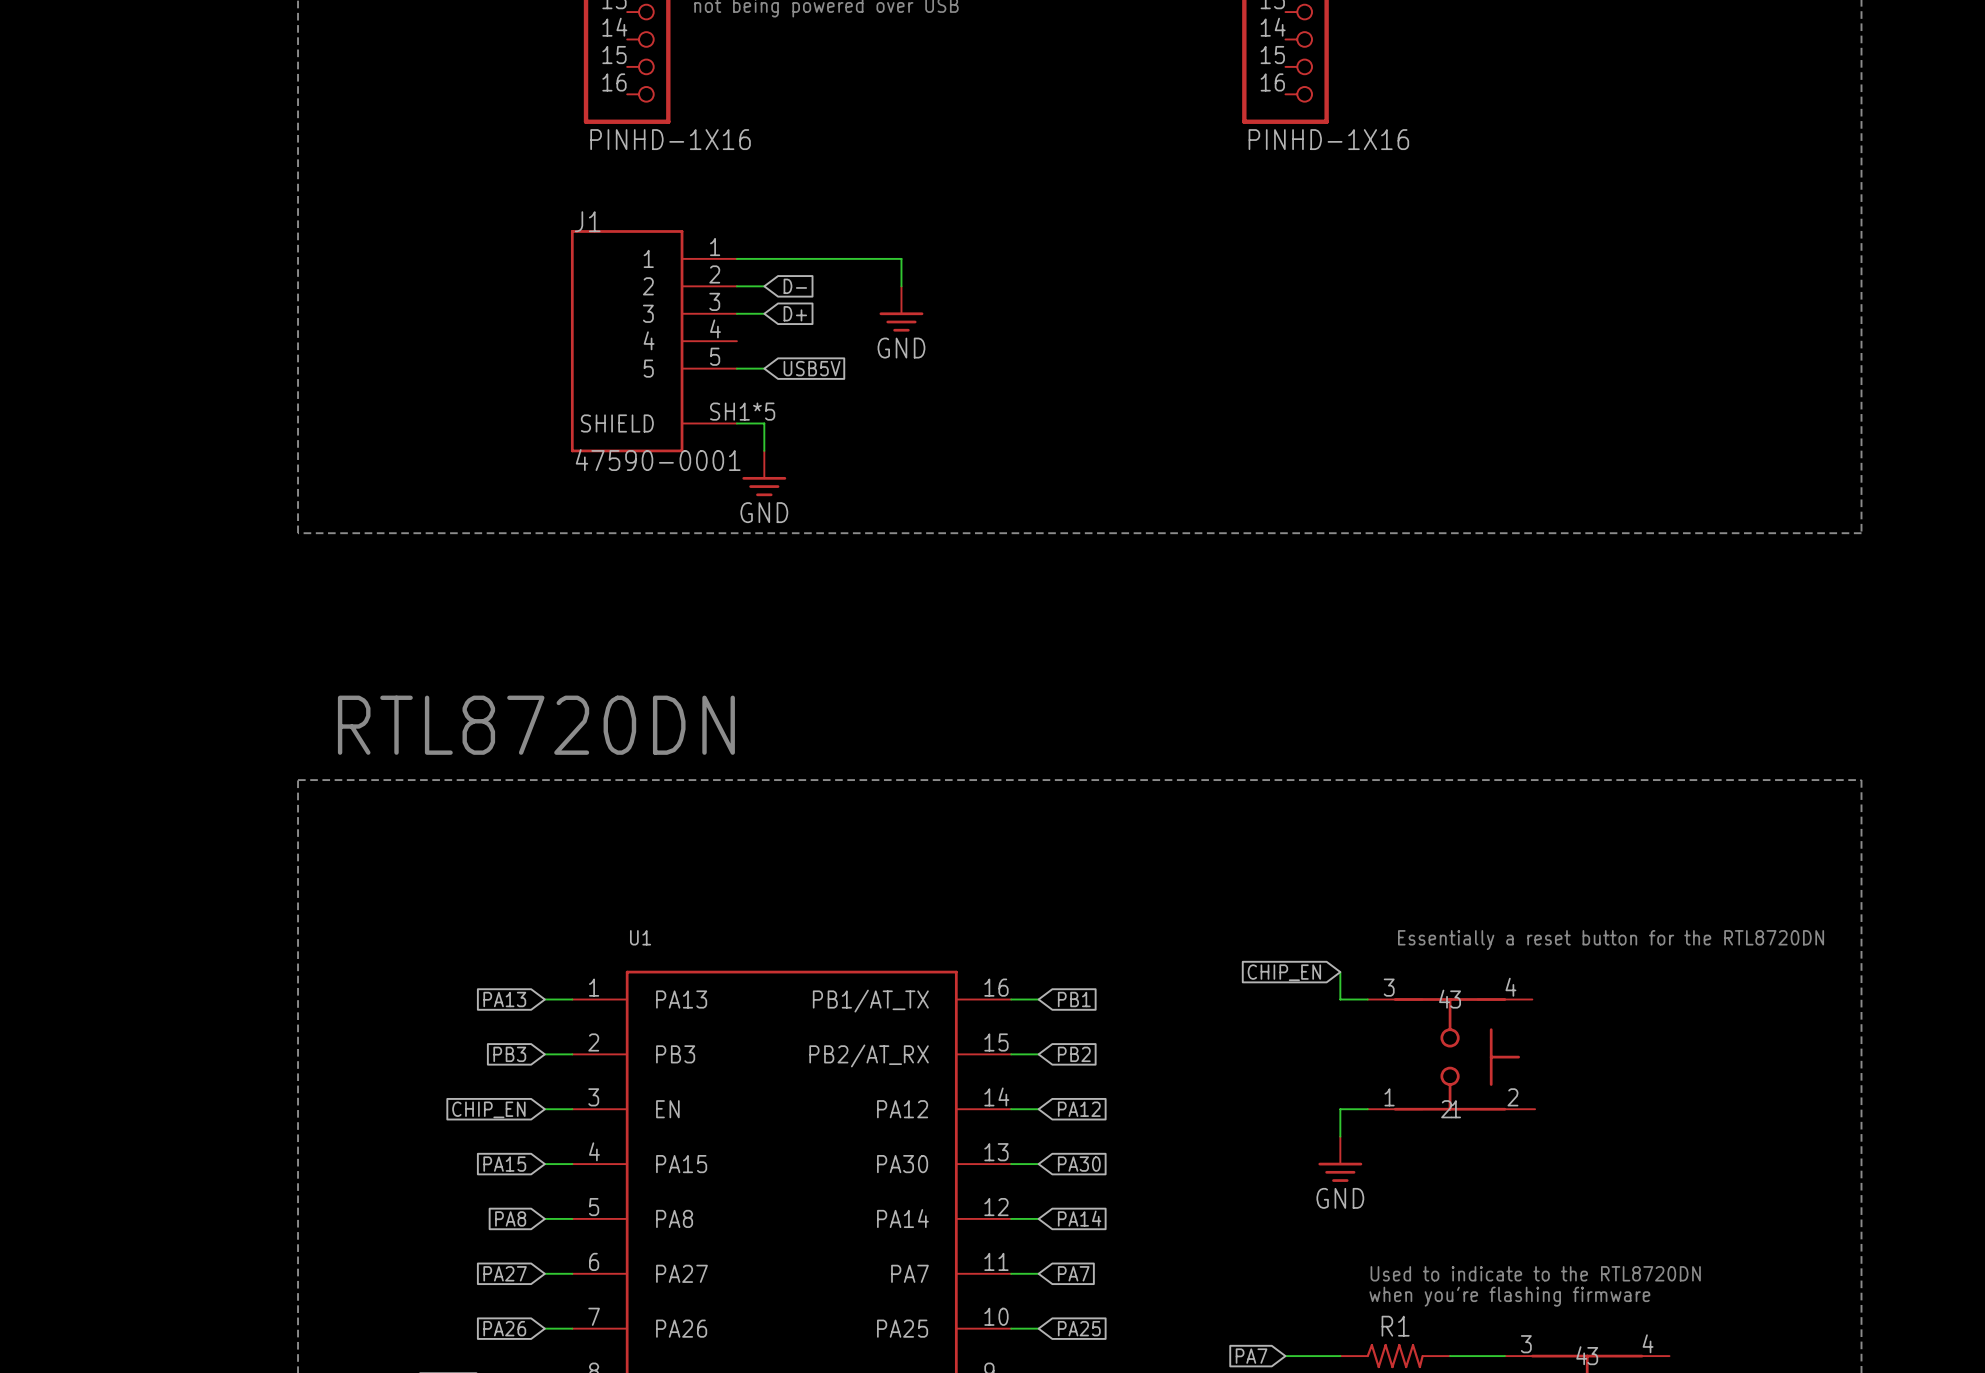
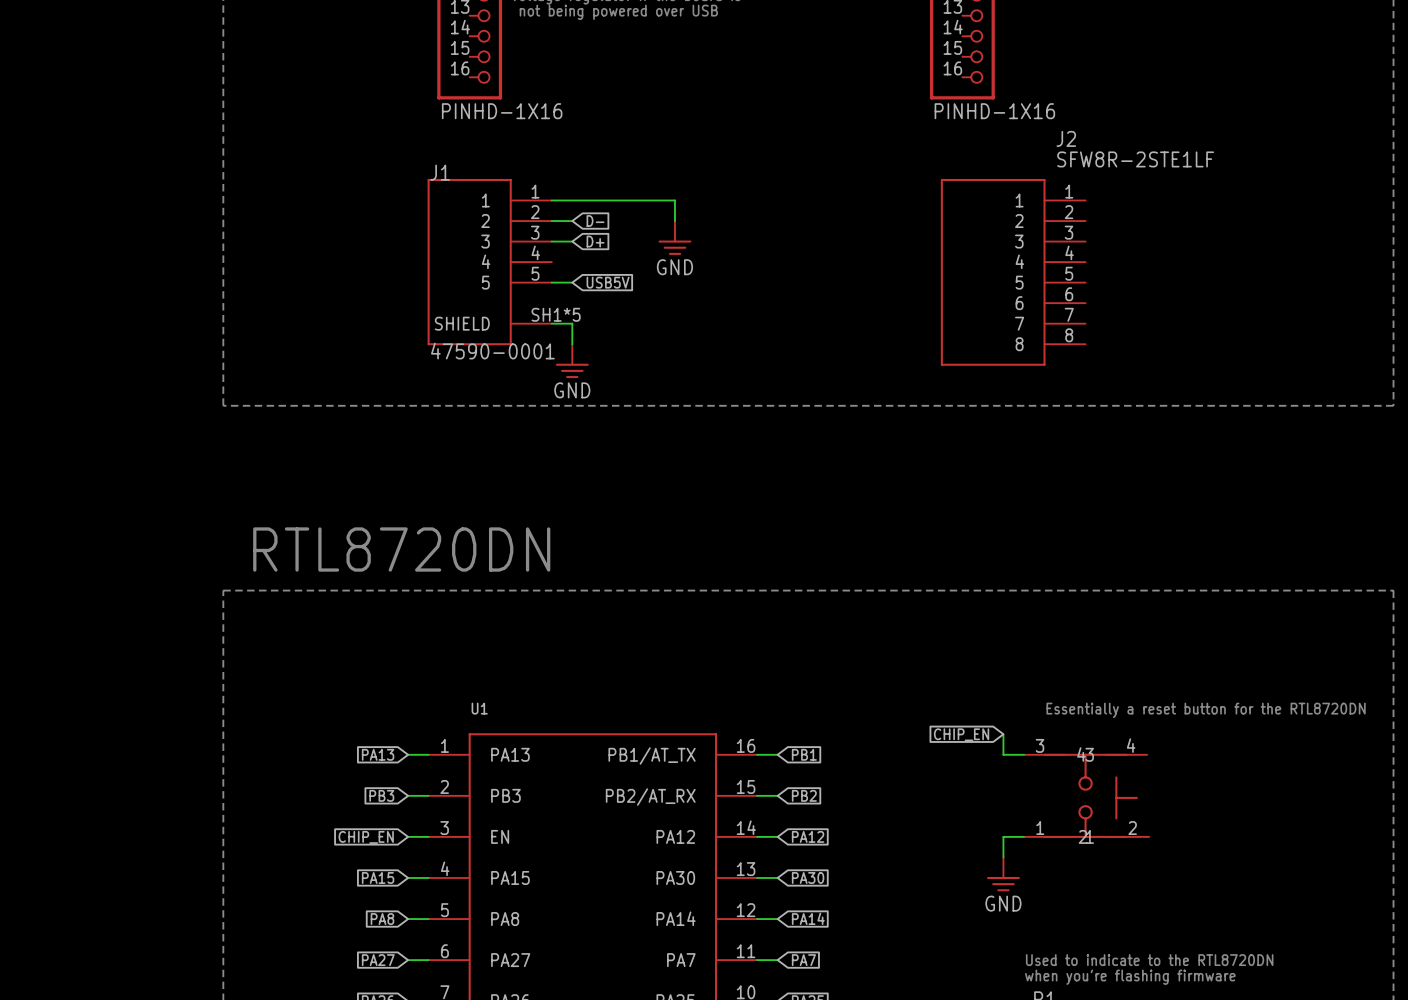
J2: none -> SFW8R-2STE1LF (1013, 272)

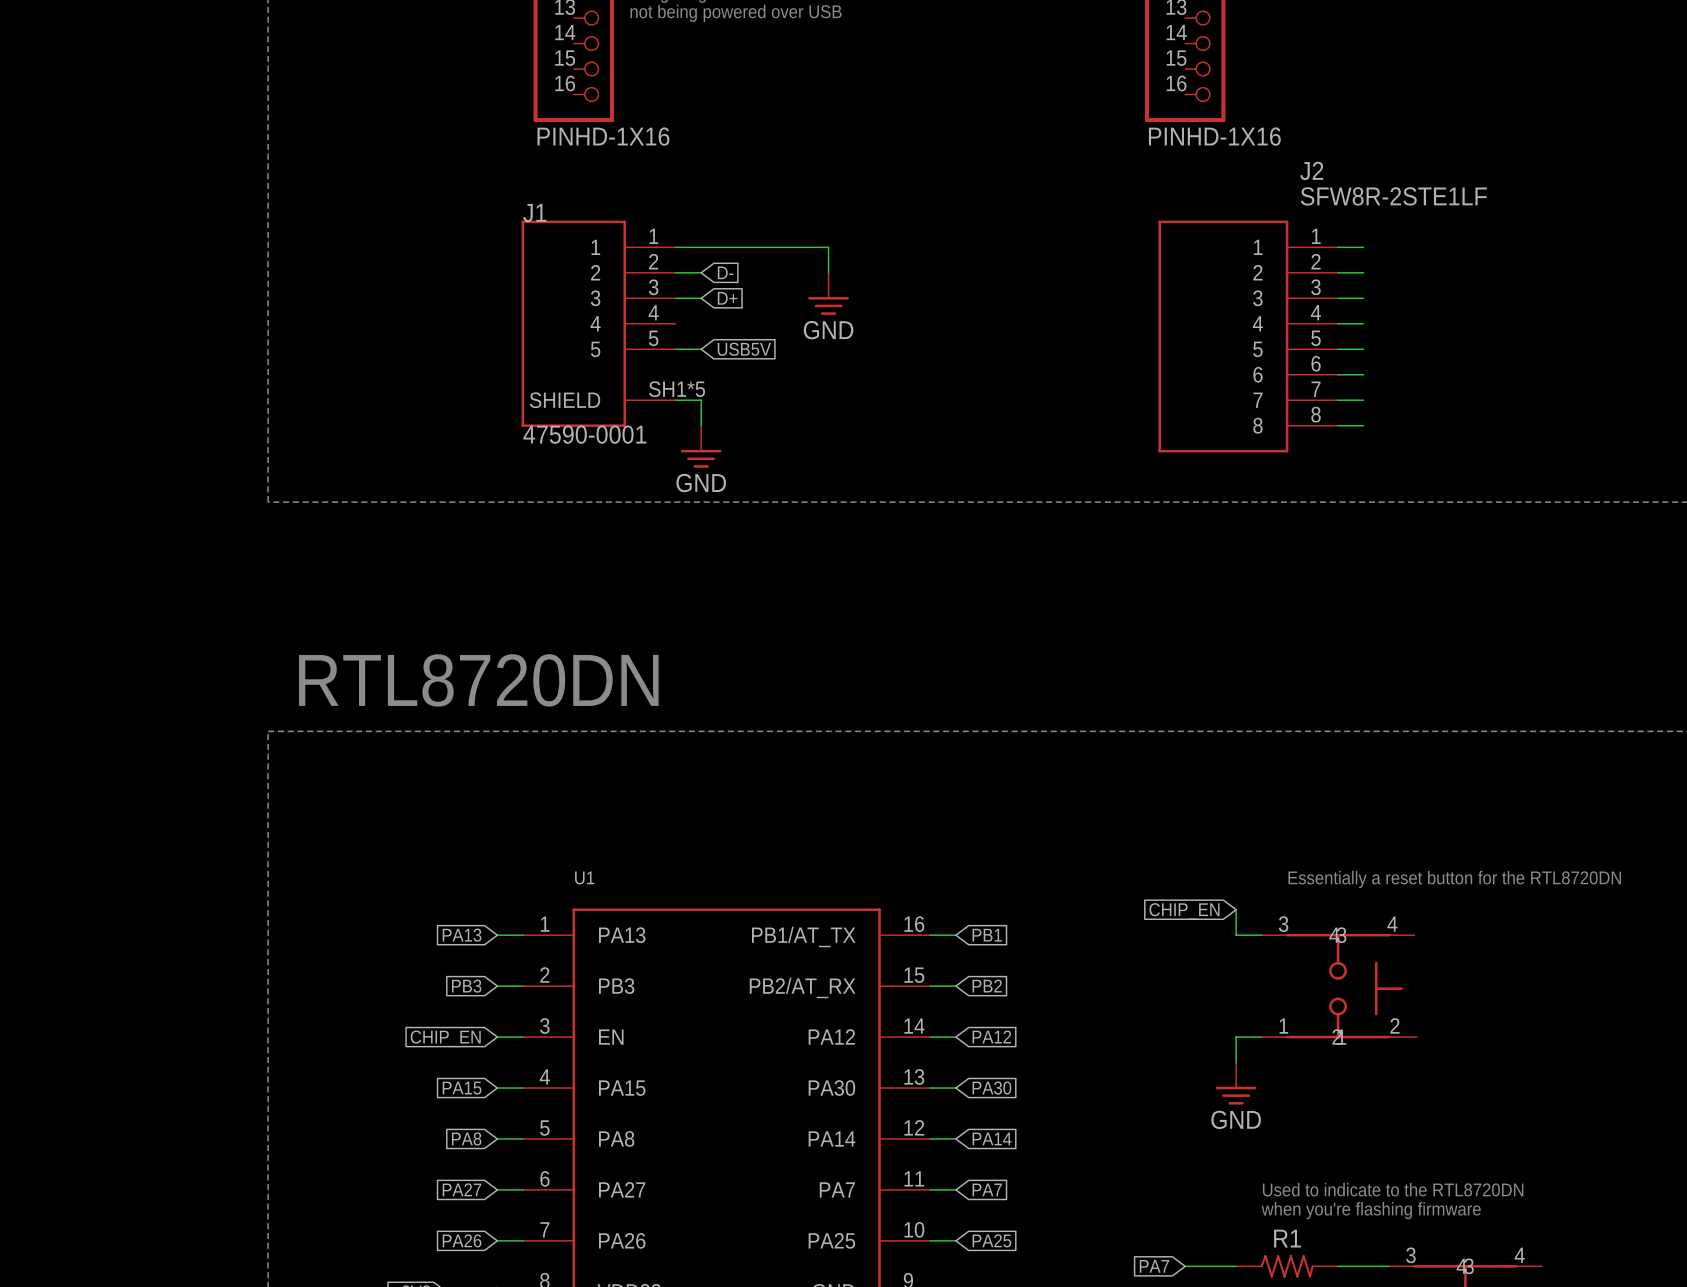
wire: none -> (1338, 247) (1363, 247)
wire: none -> (1338, 272) (1363, 272)
wire: none -> (1338, 298) (1363, 298)
wire: none -> (1338, 323) (1363, 323)
wire: none -> (1338, 349) (1363, 349)
wire: none -> (1338, 374) (1363, 374)
wire: none -> (1338, 400) (1363, 400)
wire: none -> (1338, 425) (1363, 425)

